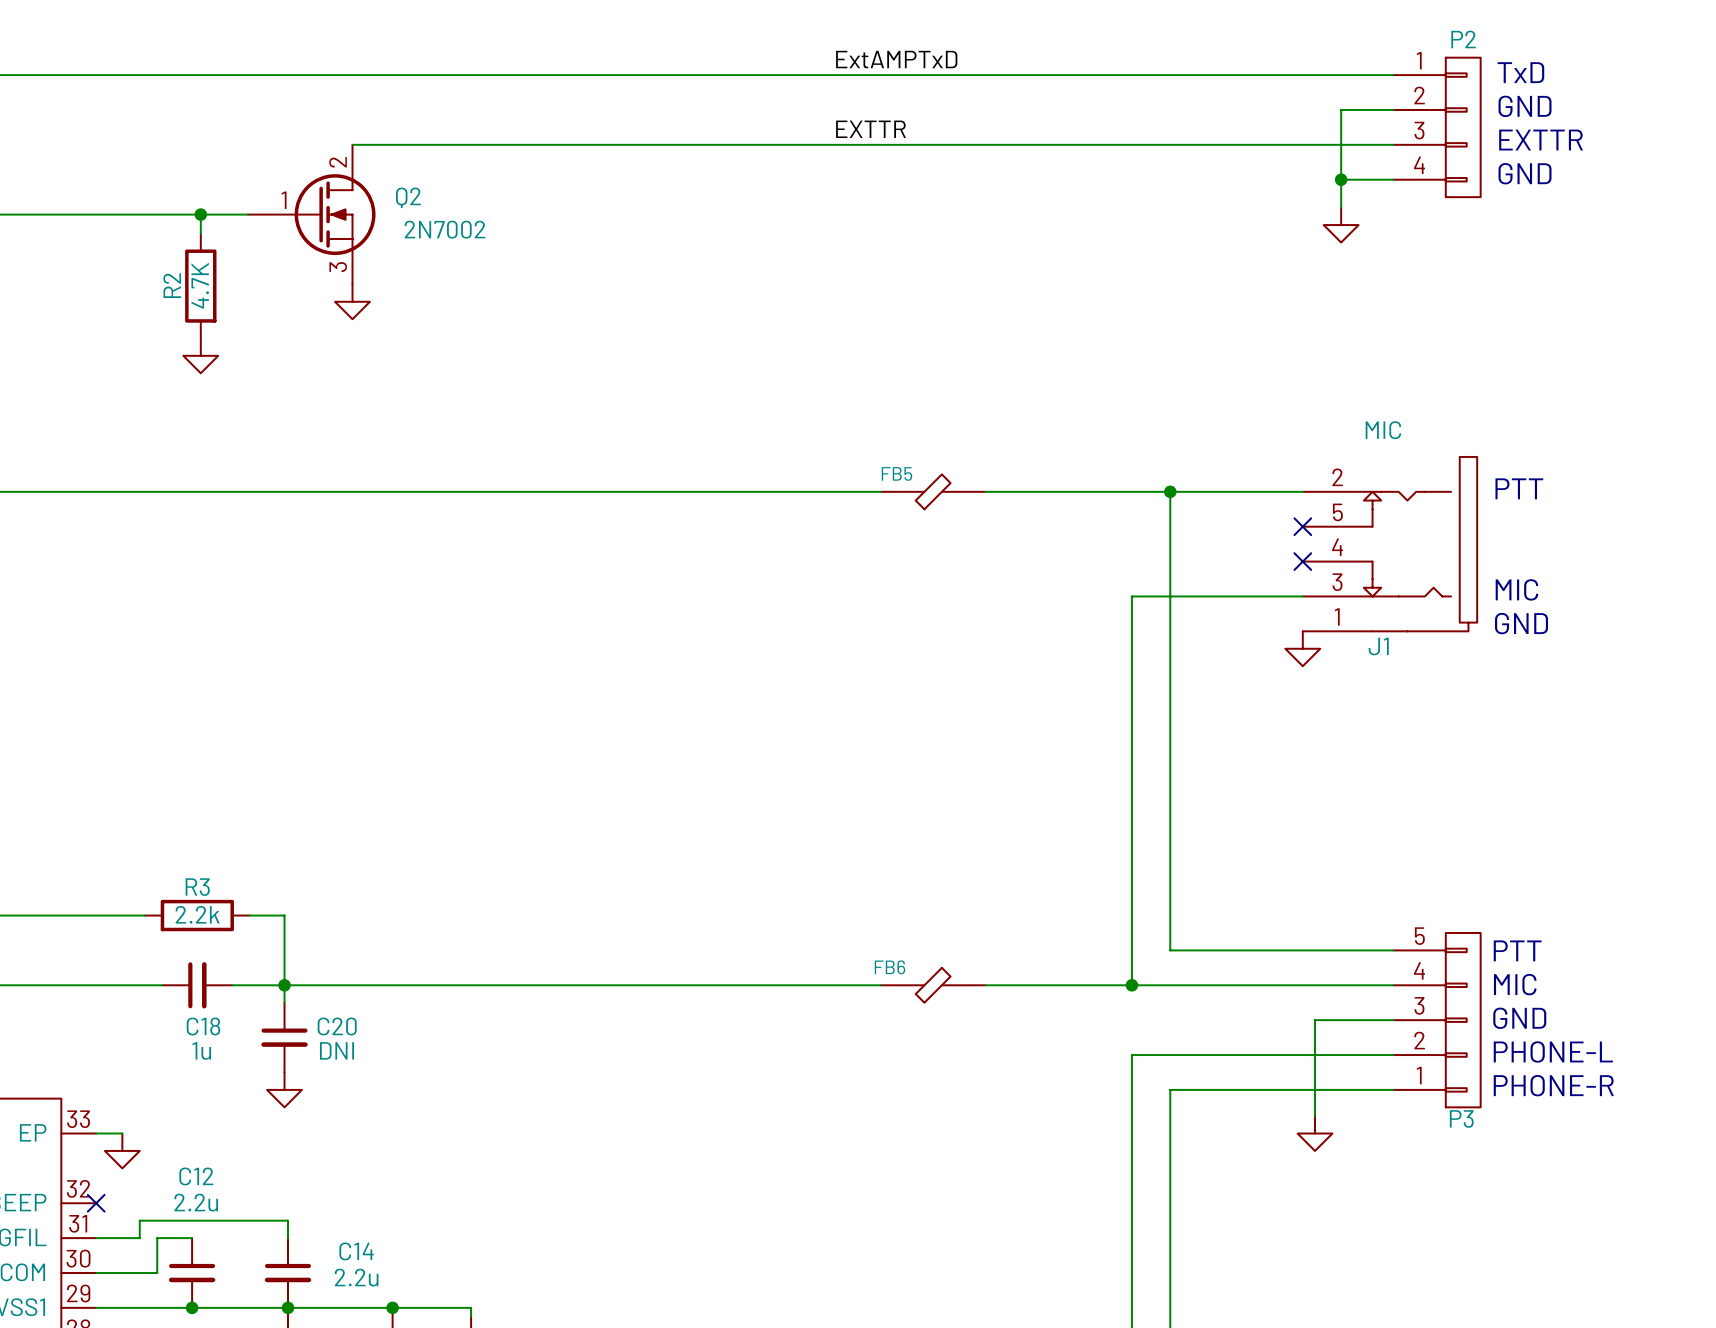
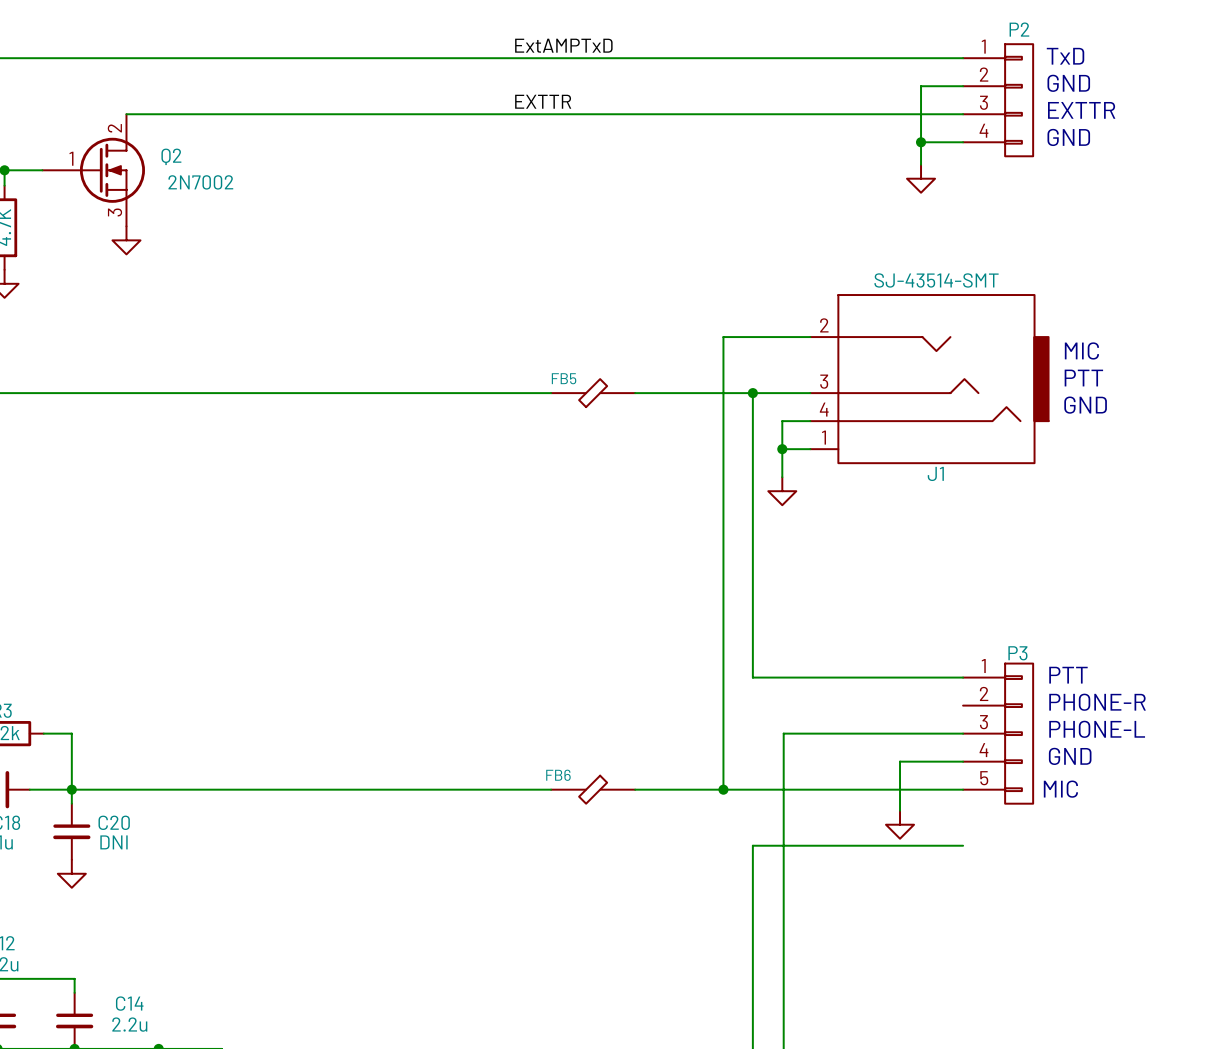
wire: none -> (810, 337) (723, 337) (723, 789)
J1 value: MIC (1383, 430) -> SJ-43514-SMT (936, 280)
J1 symbol: [1302, 456, 1478, 632] -> [810, 295, 1049, 464]
text position: PTT (1519, 488) -> PTT (1083, 378)
junction: none -> (752, 393)
wire: (1170, 491) (1170, 915) -> (963, 733) (783, 733)
junction: (1170, 491) -> none
wire: none -> (810, 421) (782, 421) (782, 477)
no-connect mark: (1302, 526) -> none
wire: none -> (782, 449) (810, 449)
junction: none -> (782, 449)
no-connect mark: (1302, 561) -> none
text position: MIC (1516, 589) -> MIC (1081, 350)
wire: (1131, 596) (1302, 596) -> (752, 477) (752, 393)
text position: GND (1521, 623) -> GND (1085, 405)
power symbol position: (1302, 648) -> (782, 491)
wire: (1131, 845) (1131, 985) -> (752, 677) (963, 677)
text: none -> PHONE-R (1097, 702)
wire: (1170, 950) (1315, 950) -> (900, 810) (900, 761)
text position: PTT (1517, 950) -> PTT (1068, 675)
junction position: (1131, 985) -> (723, 789)
text position: GND (1519, 1018) -> GND (1070, 756)
wire: (1393, 1020) (1315, 1020) (1315, 1116) -> none
P3 position: (1437, 1020) -> (998, 733)
P3 flip: as is (1463, 1020) -> up-down (1019, 733)
text position: PHONE-L (1553, 1051) -> PHONE-L (1097, 729)
text: PHONE-R (1553, 1085) -> none
wire: (1170, 1089) (1393, 1089) -> (783, 873) (783, 761)
power symbol position: (1315, 1133) -> (900, 824)

